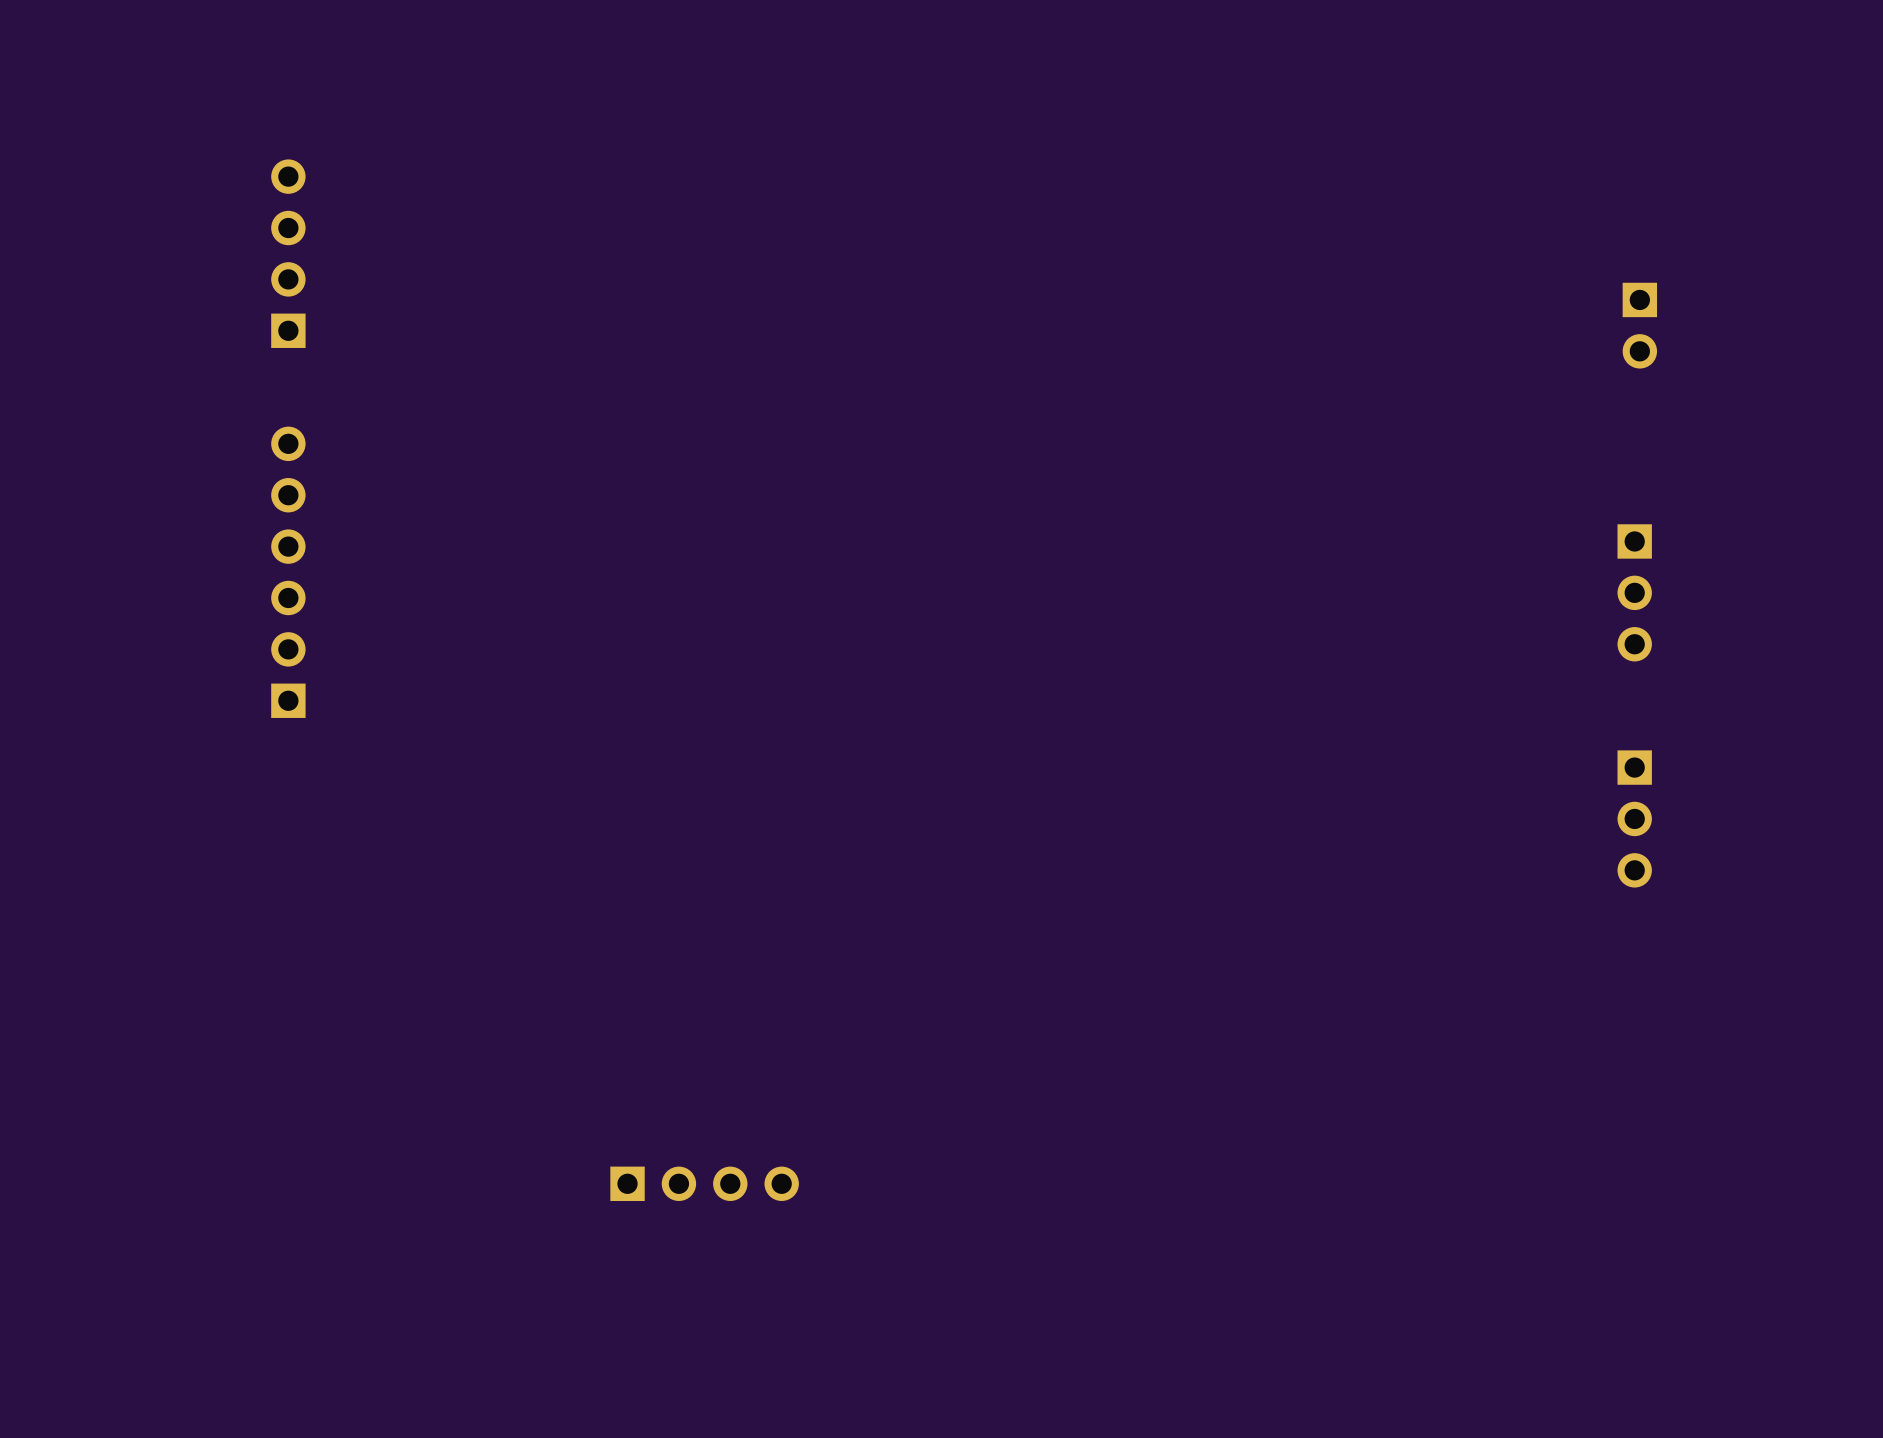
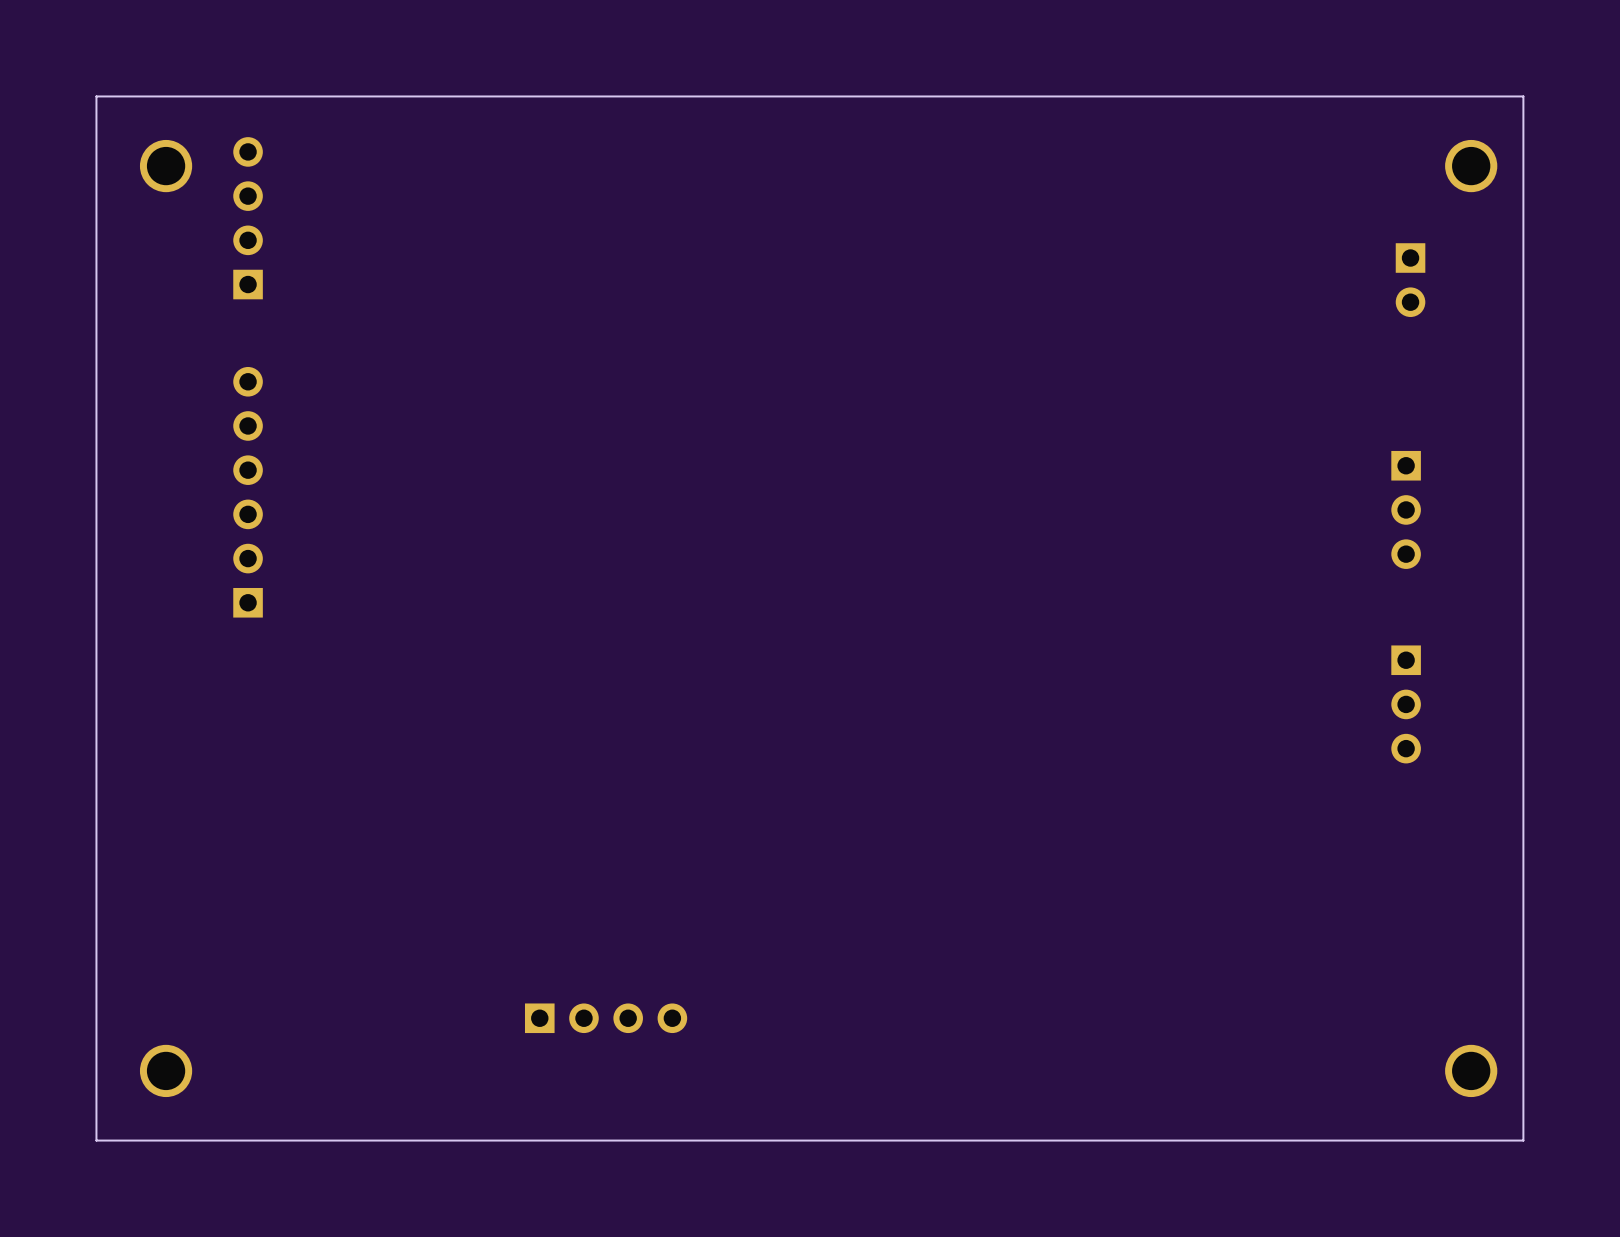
board edge: none -> (1523, 96) (96, 96) (96, 1140) (1523, 1140) (1523, 96)
part: none -> (166, 166)
part: none -> (1471, 166)
part: none -> (166, 1070)
part: none -> (1471, 1070)

